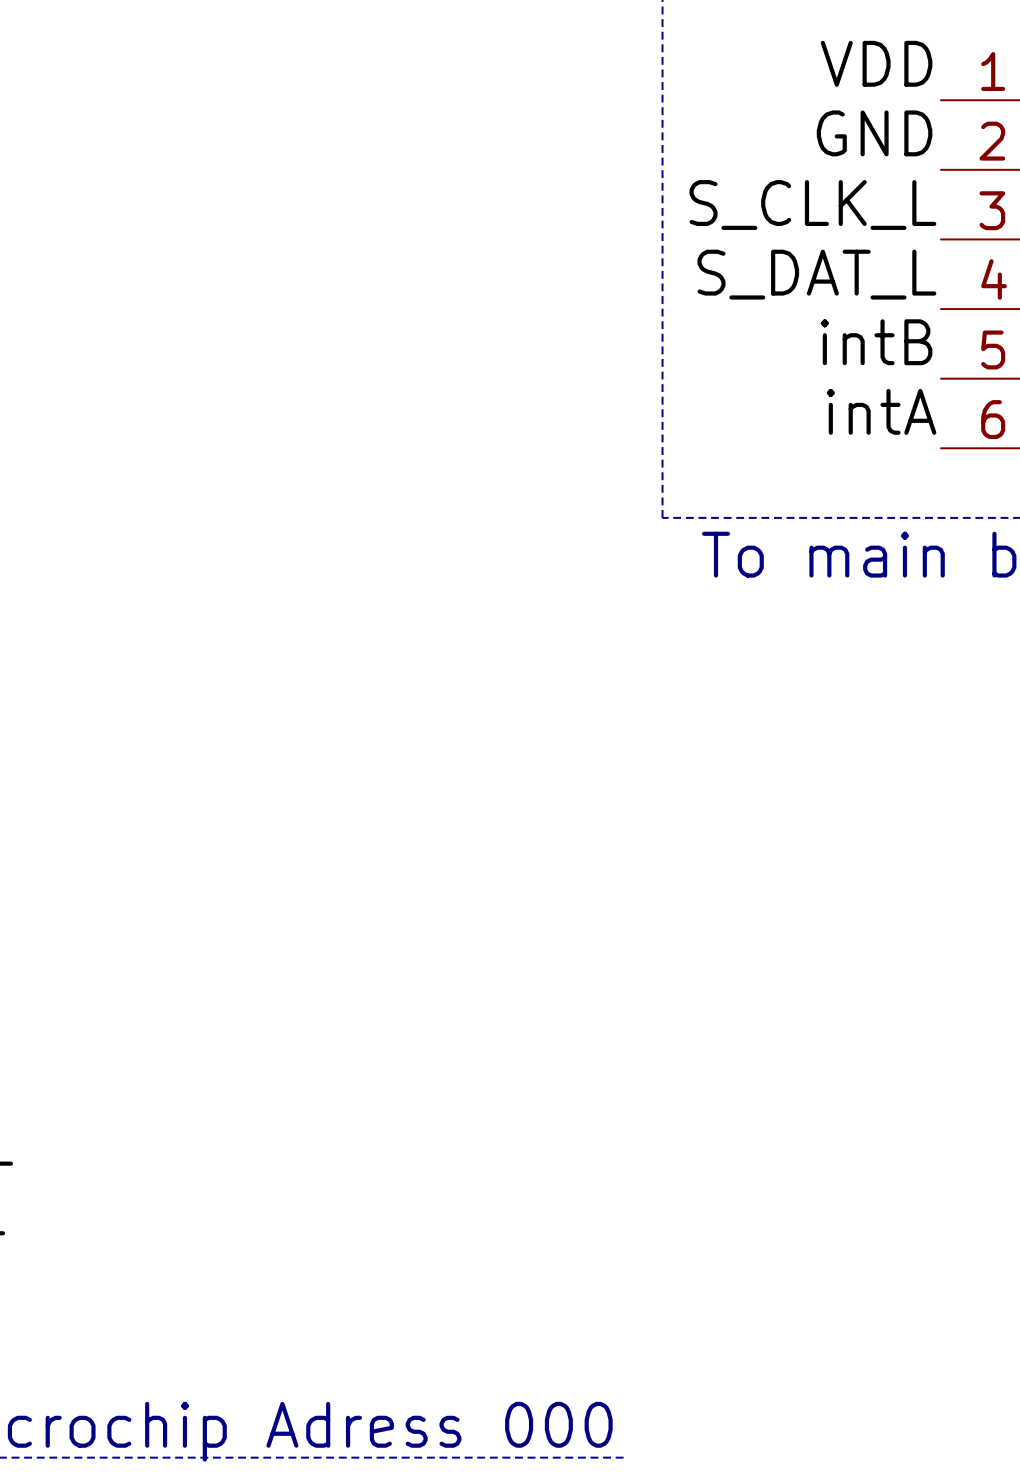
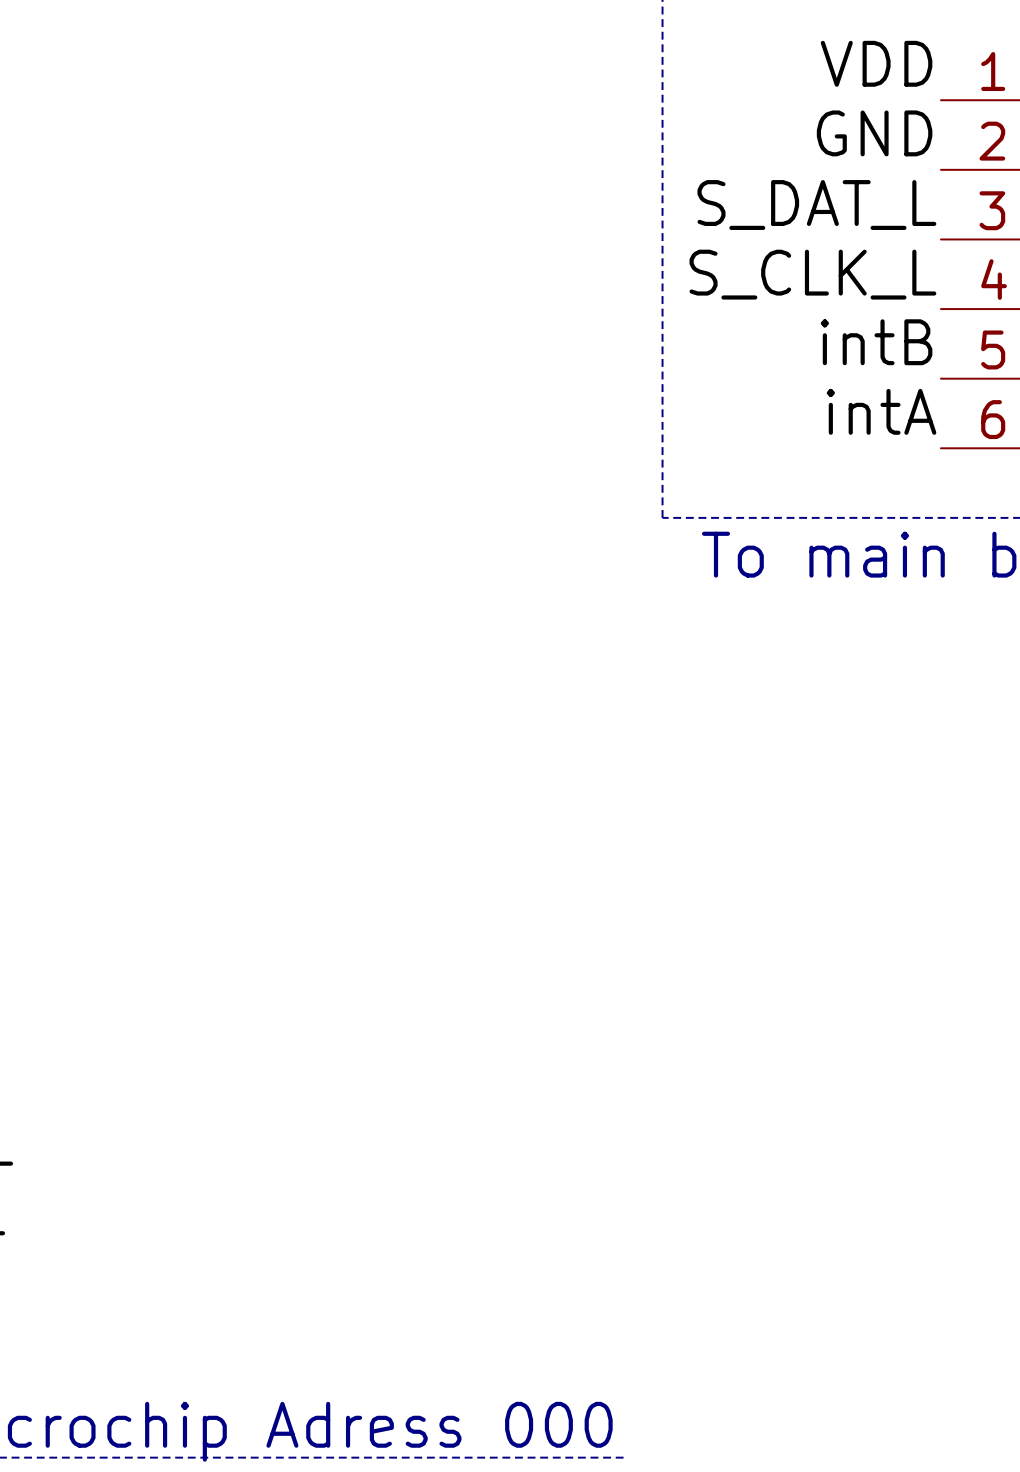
label: S_CLK_L (812, 205) -> S_DAT_L (816, 205)
label: S_DAT_L (816, 274) -> S_CLK_L (812, 274)

